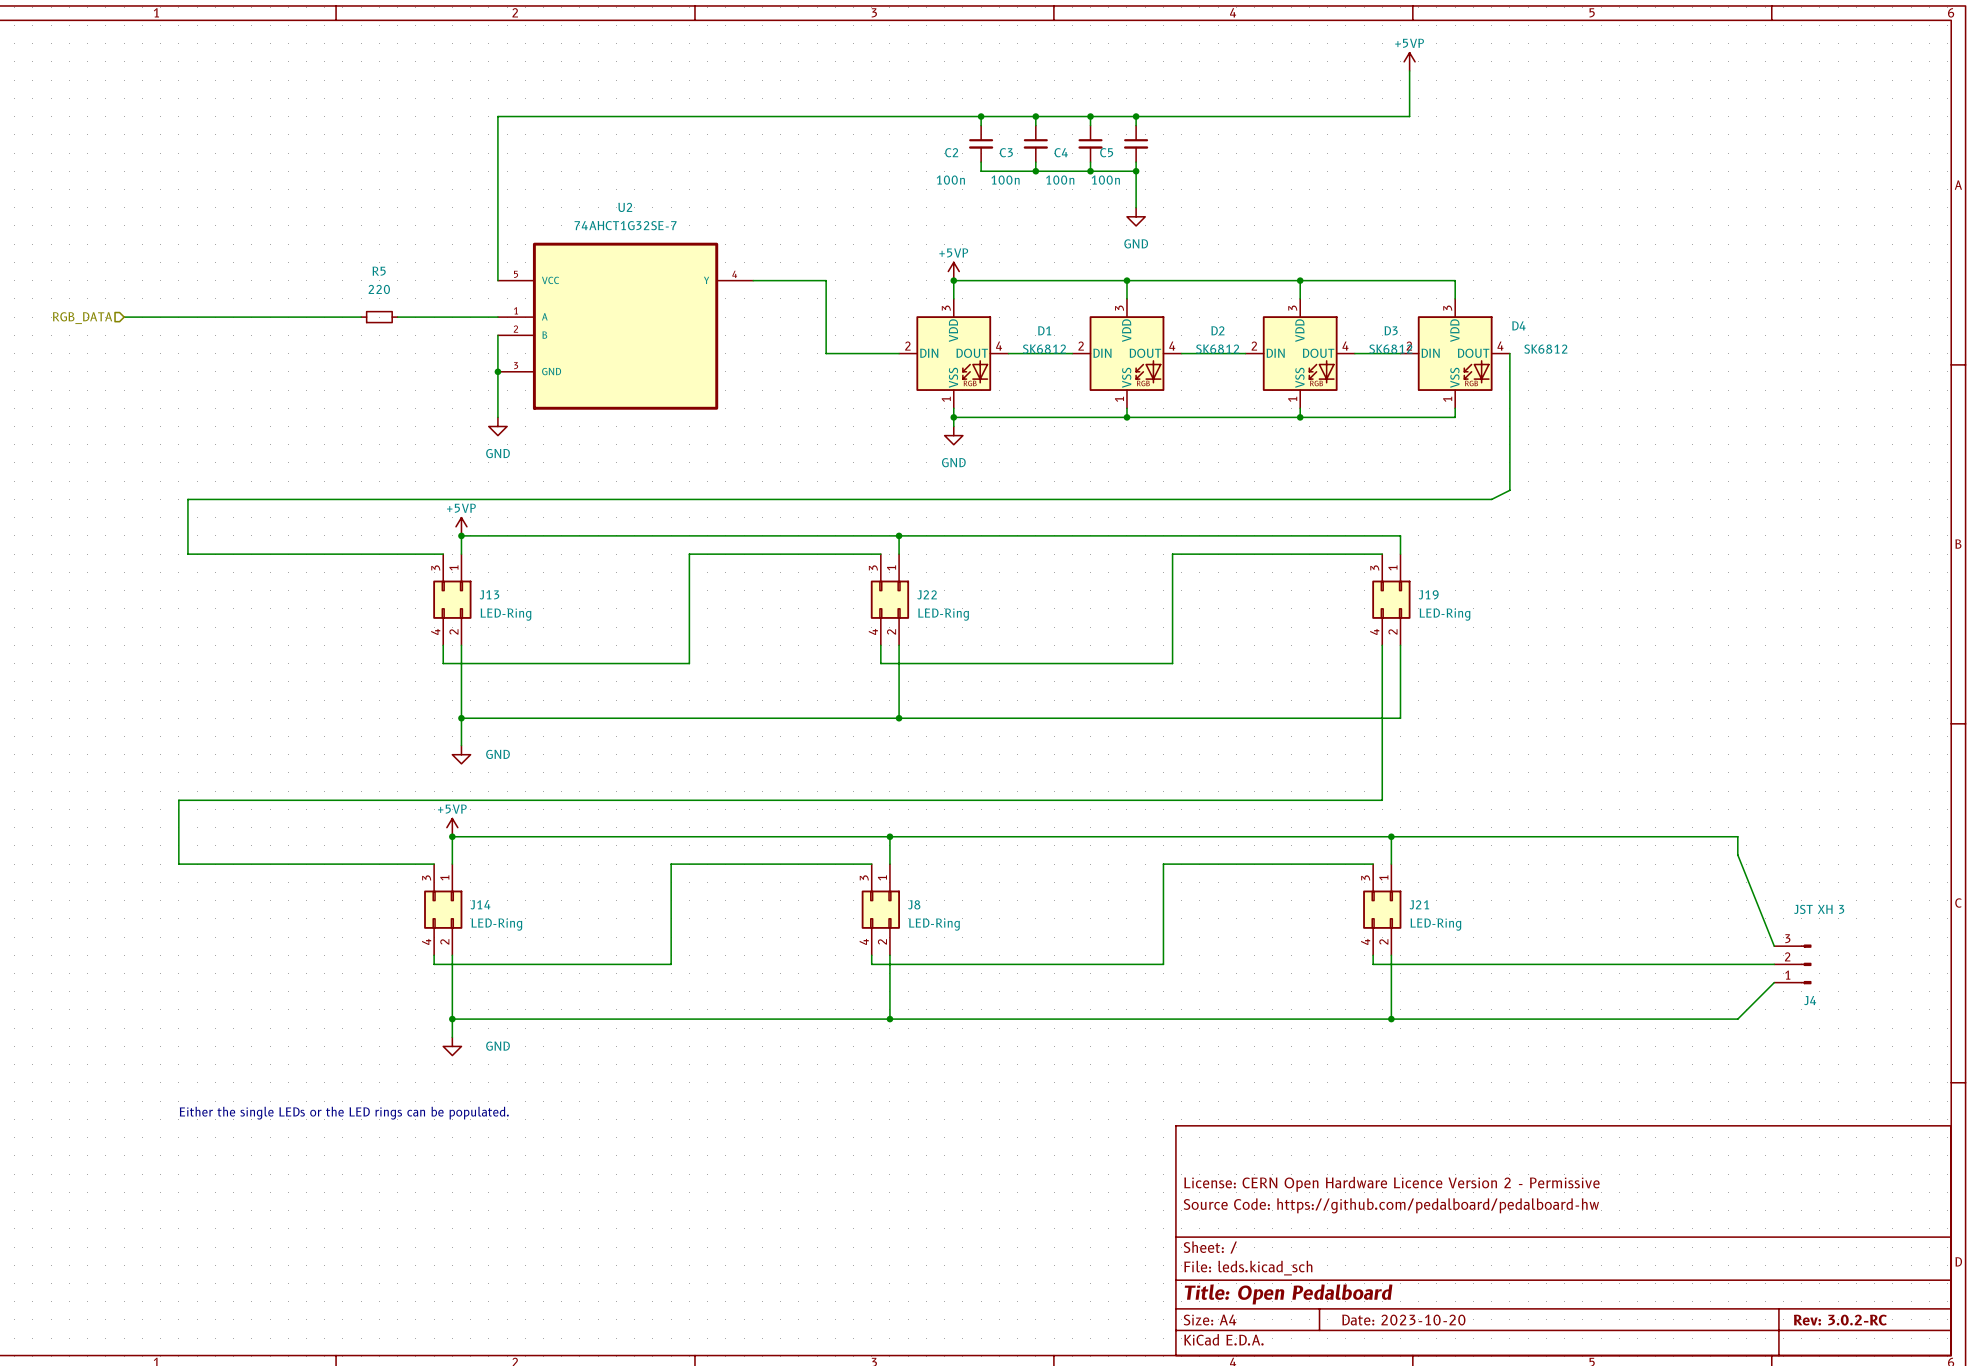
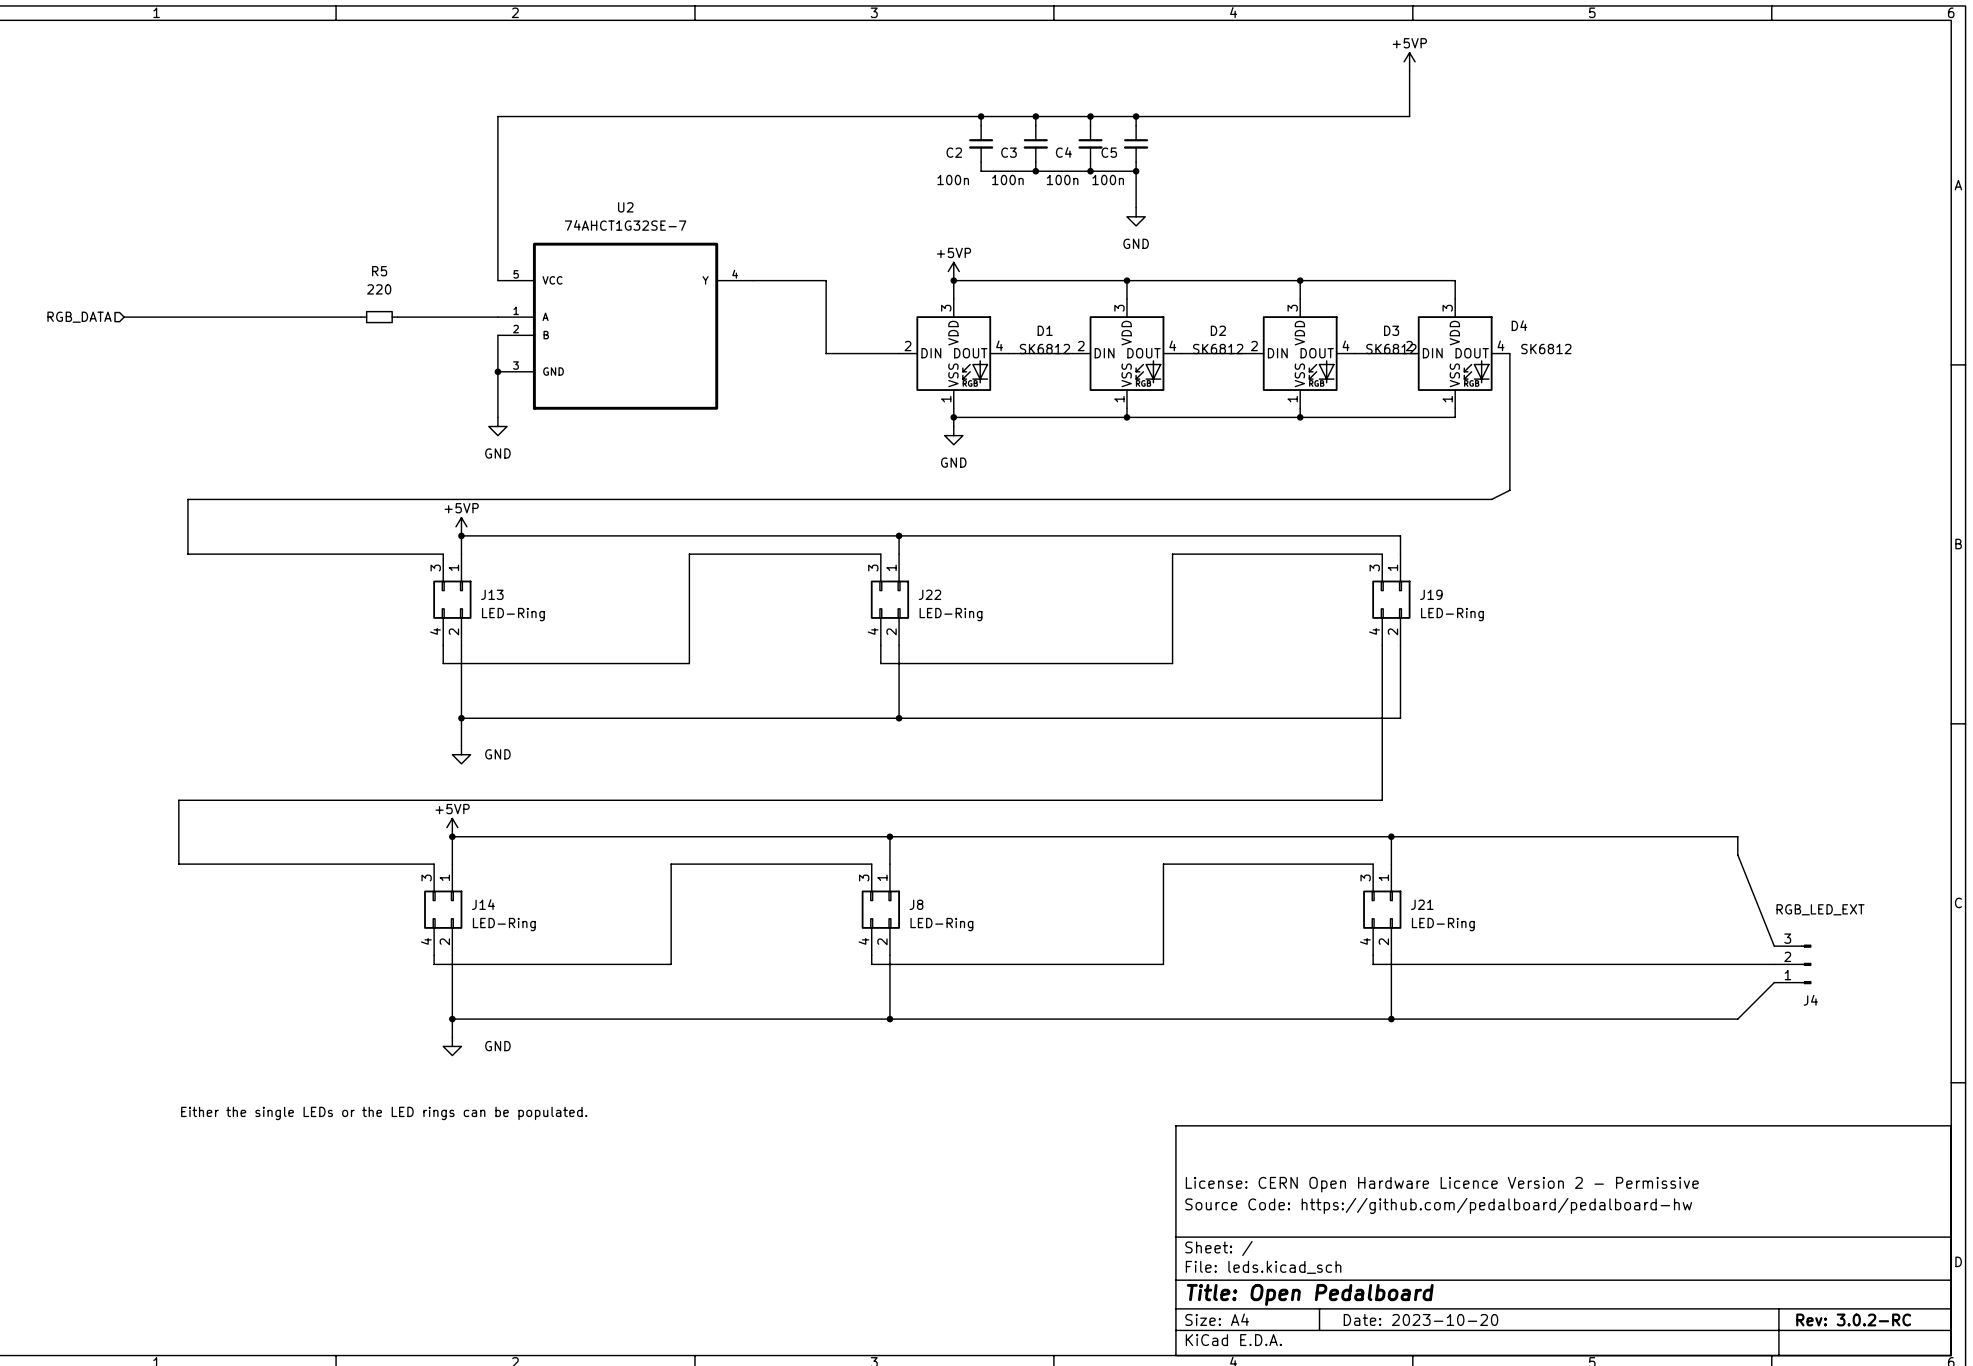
J4 value: JST XH 3 (1819, 909) -> RGB_LED_EXT (1820, 909)

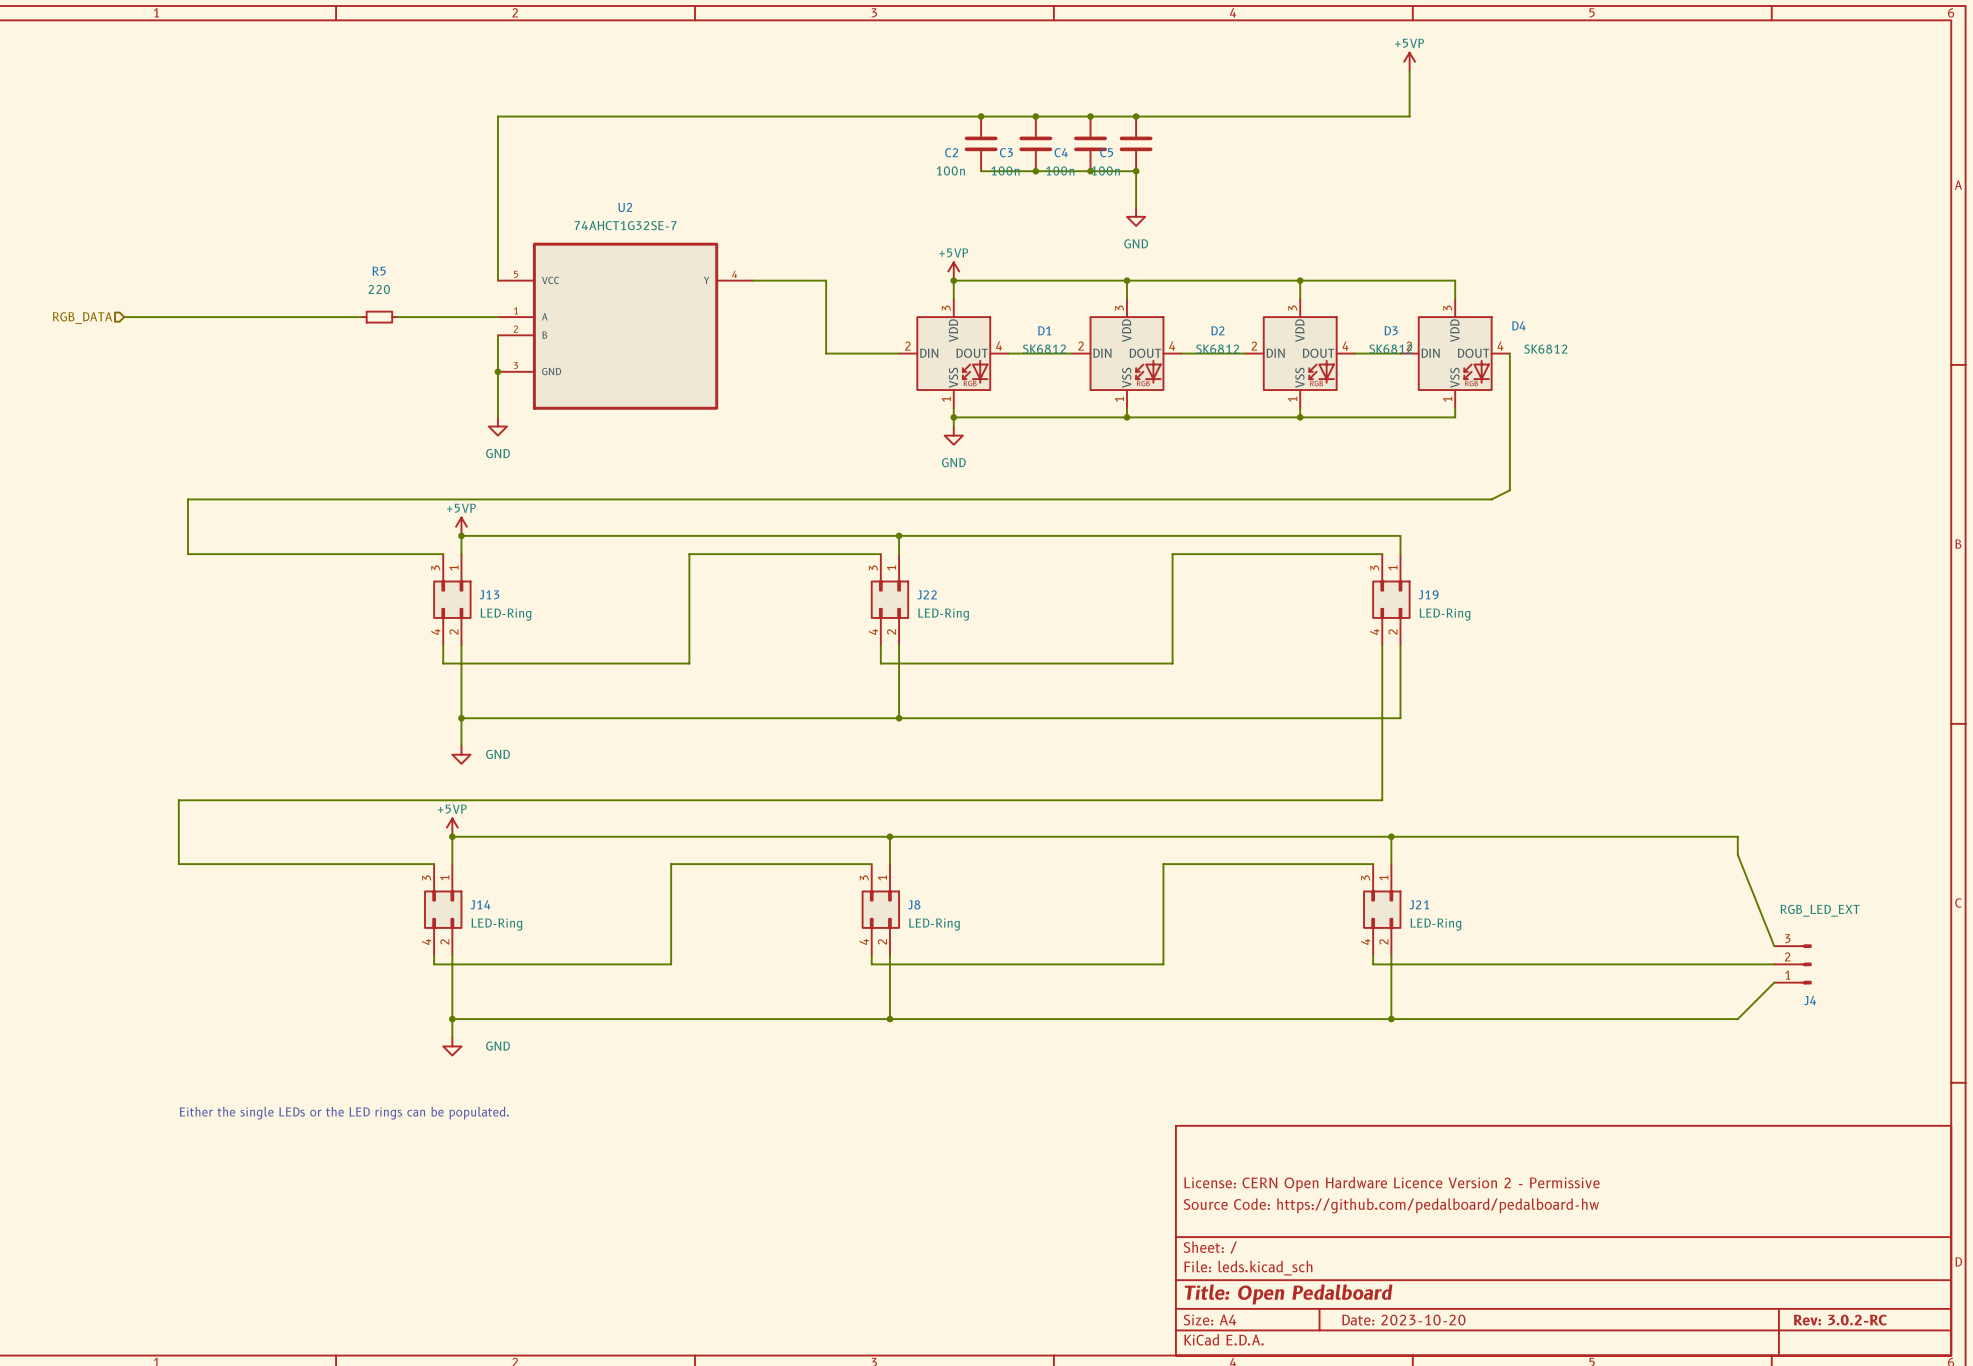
C2 symbol: [968, 125, 994, 163] -> [964, 116, 998, 172]
C3 symbol: [1023, 125, 1048, 163] -> [1019, 116, 1053, 172]
C4 symbol: [1078, 125, 1103, 163] -> [1074, 116, 1107, 172]
C5 symbol: [1123, 125, 1149, 163] -> [1119, 116, 1153, 172]

